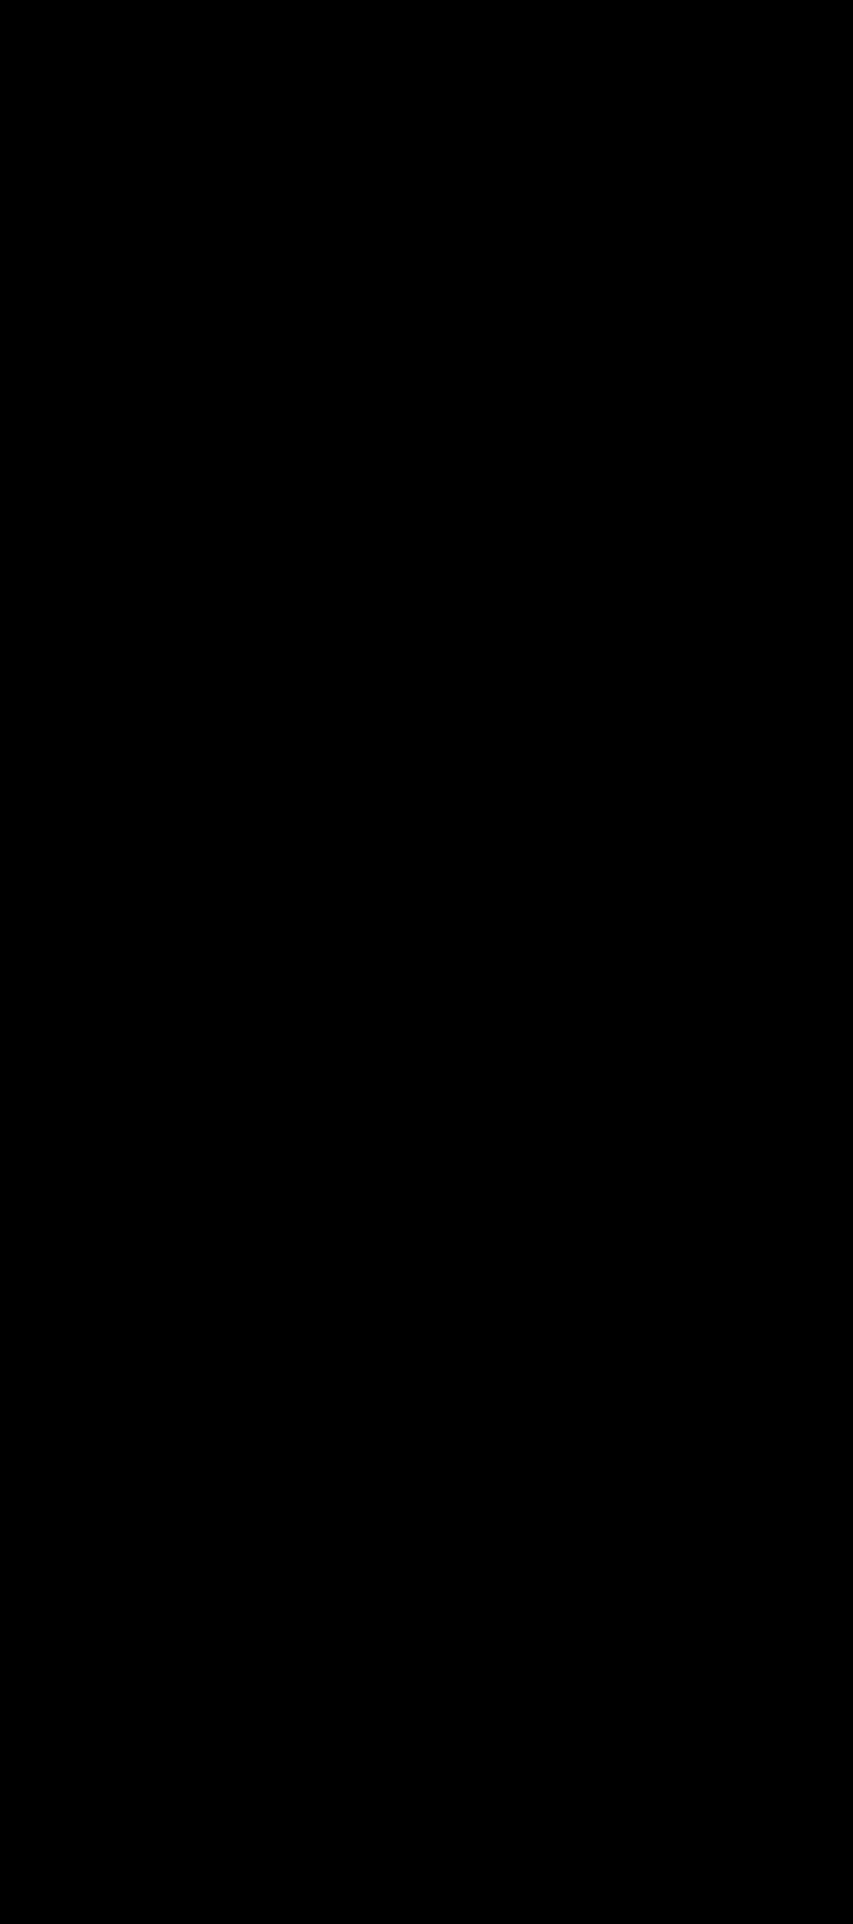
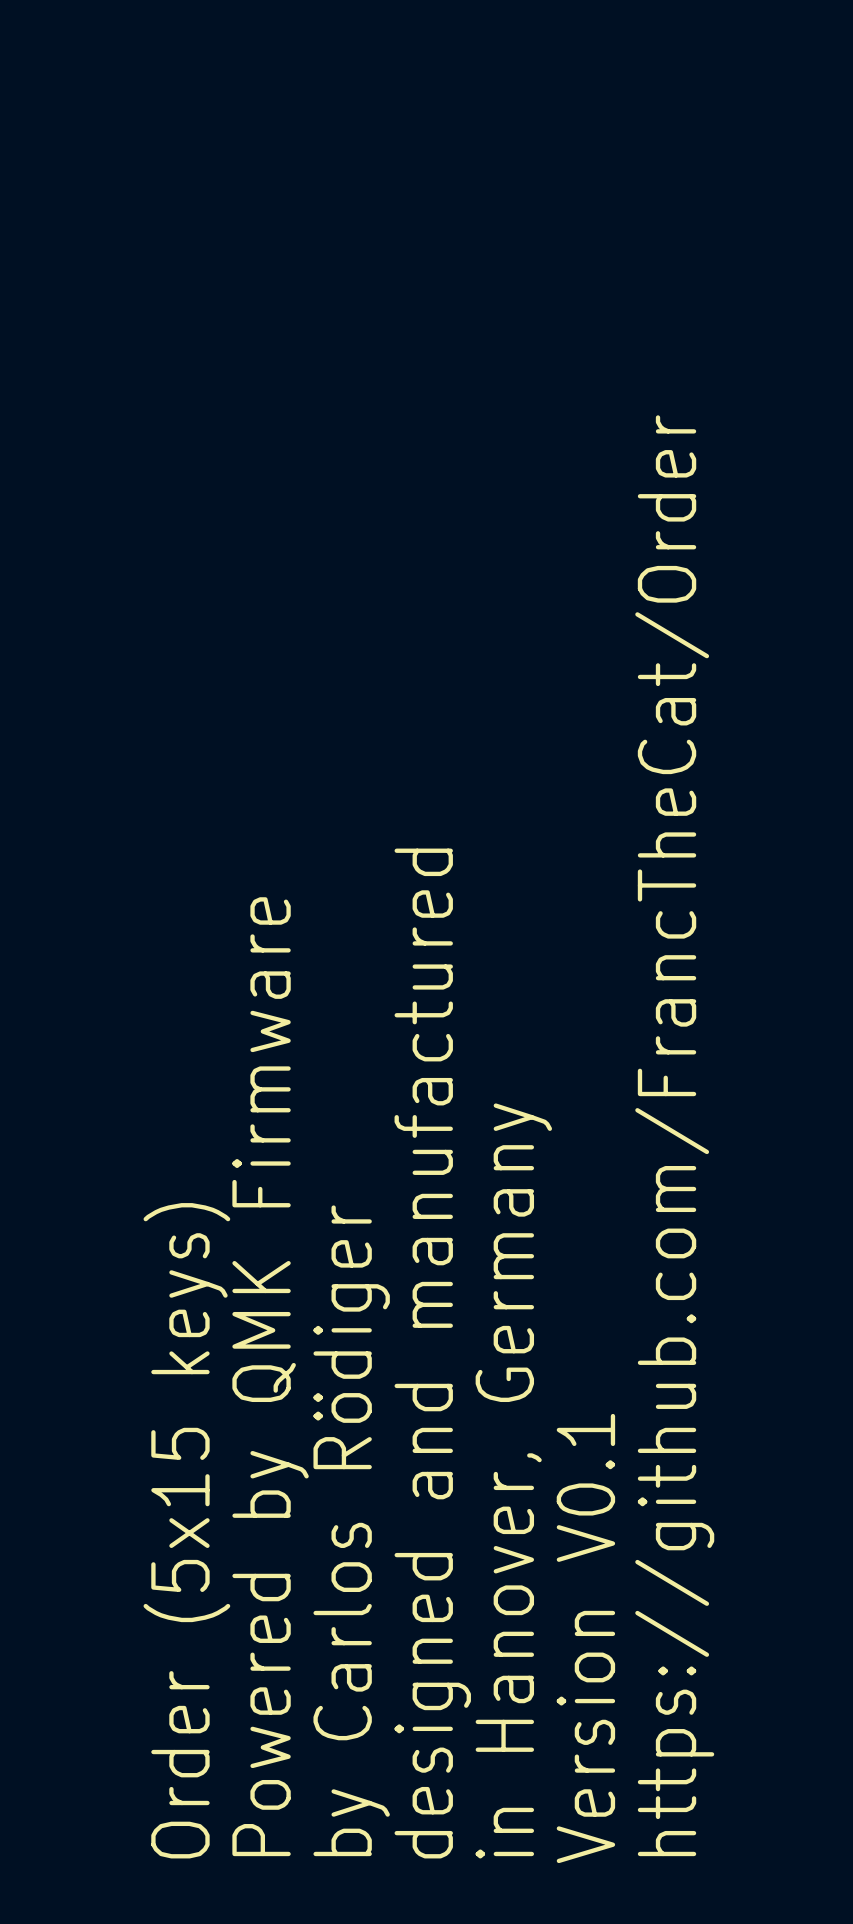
text: none -> https://github.com/FrancTheCat/Order (674, 1135)
text: none -> designed and manufactured (432, 1353)
text: none -> Powered by QMK Firmware (270, 1376)
text: none -> in Hanover, Germany (513, 1480)
text: none -> Order (5x15 keys) (186, 1530)
text: none -> by Carlos Rödiger (351, 1530)
text: none -> Version V0.1 (585, 1638)

